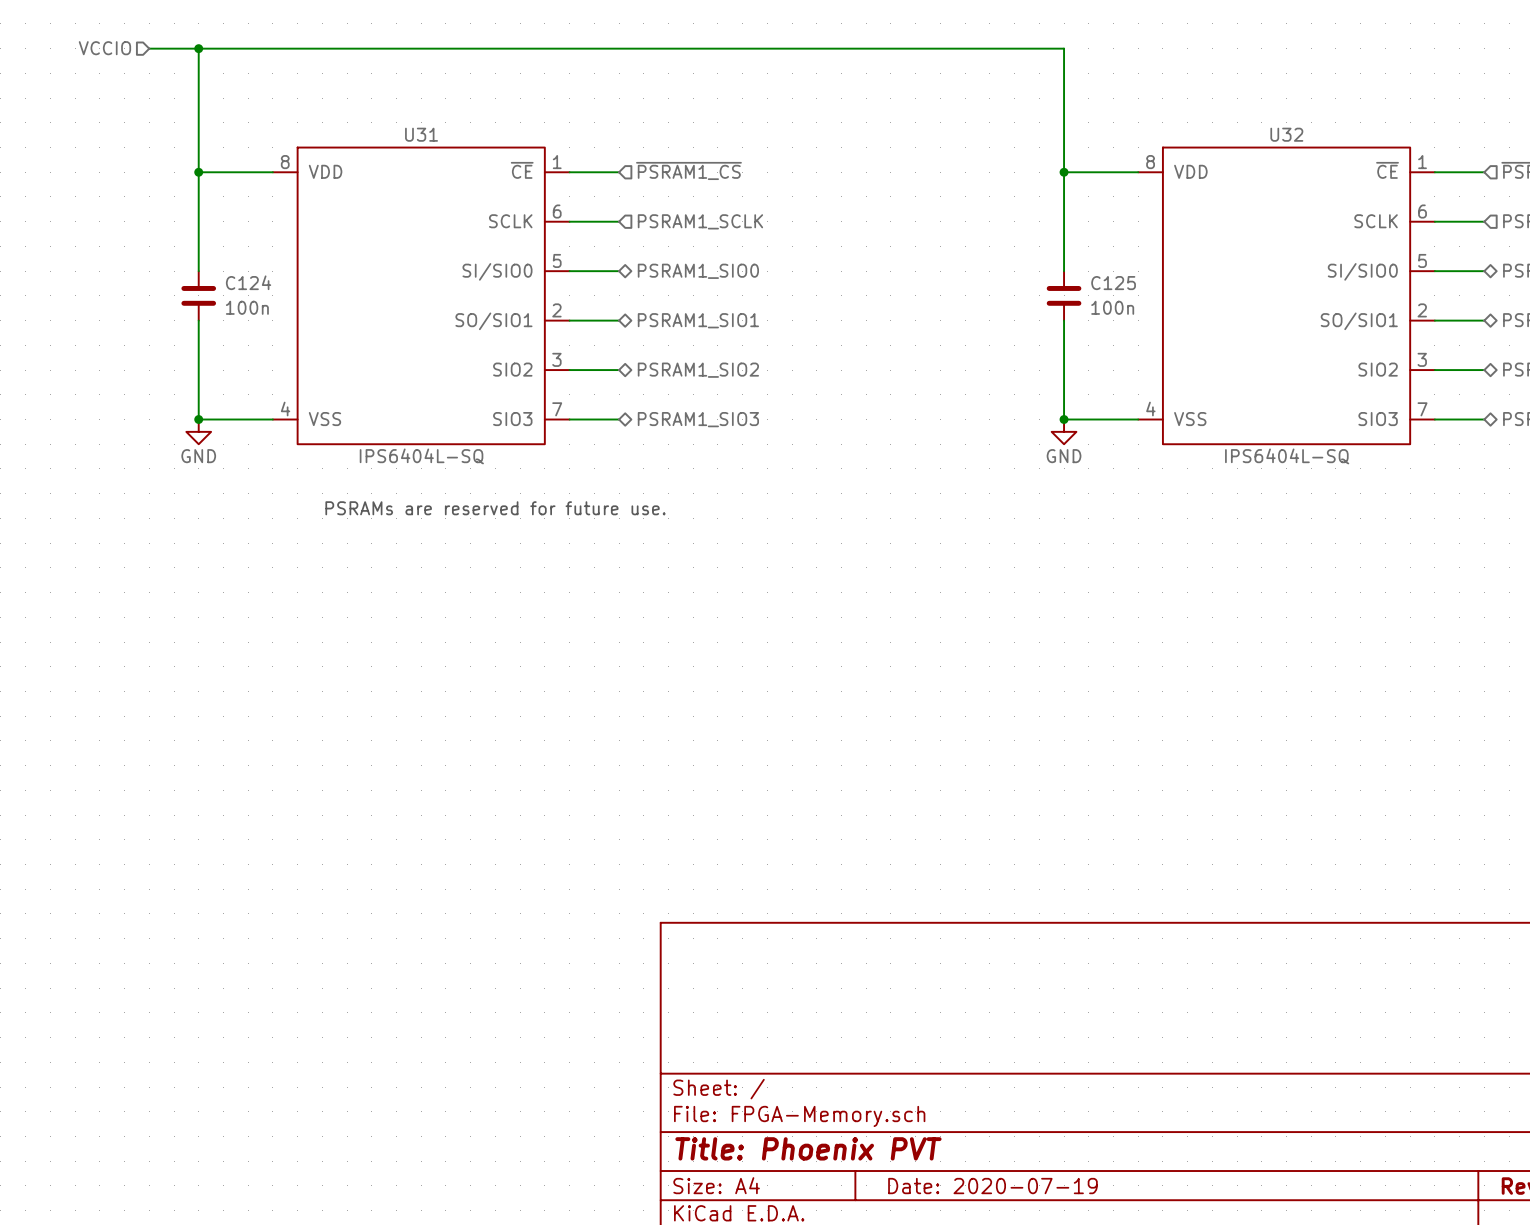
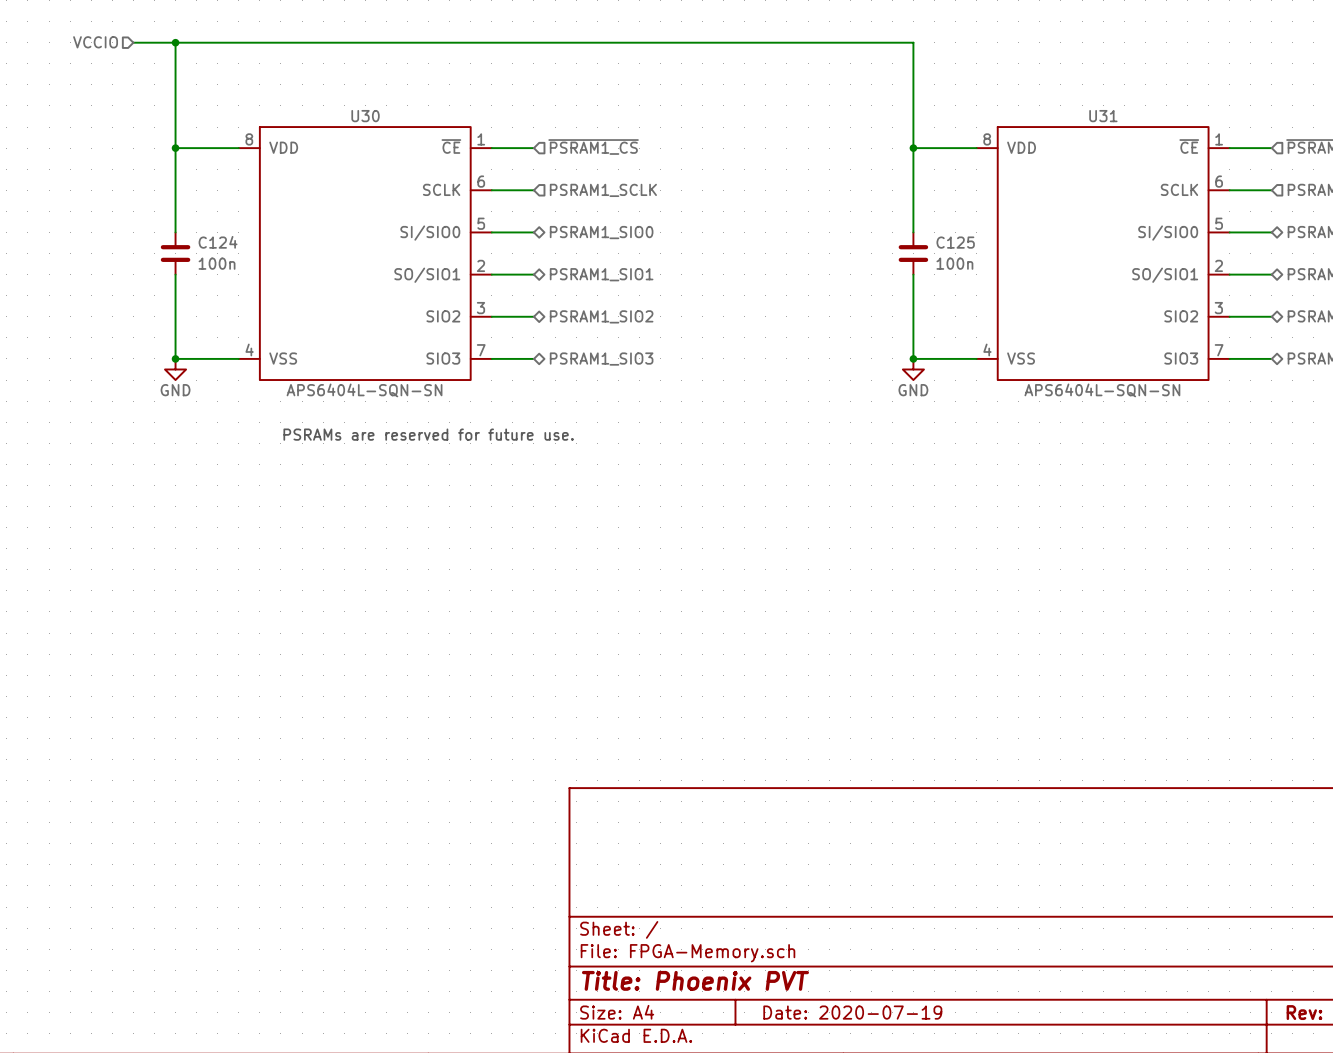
U31 name: U31 (421, 134) -> U30 (365, 116)
U32 name: U32 (1286, 134) -> U31 (1103, 116)
U31 value: IPS6404L-SQ (421, 456) -> APS6404L-SQN-SN (364, 390)
U32 value: IPS6404L-SQ (1287, 456) -> APS6404L-SQN-SN (1102, 390)

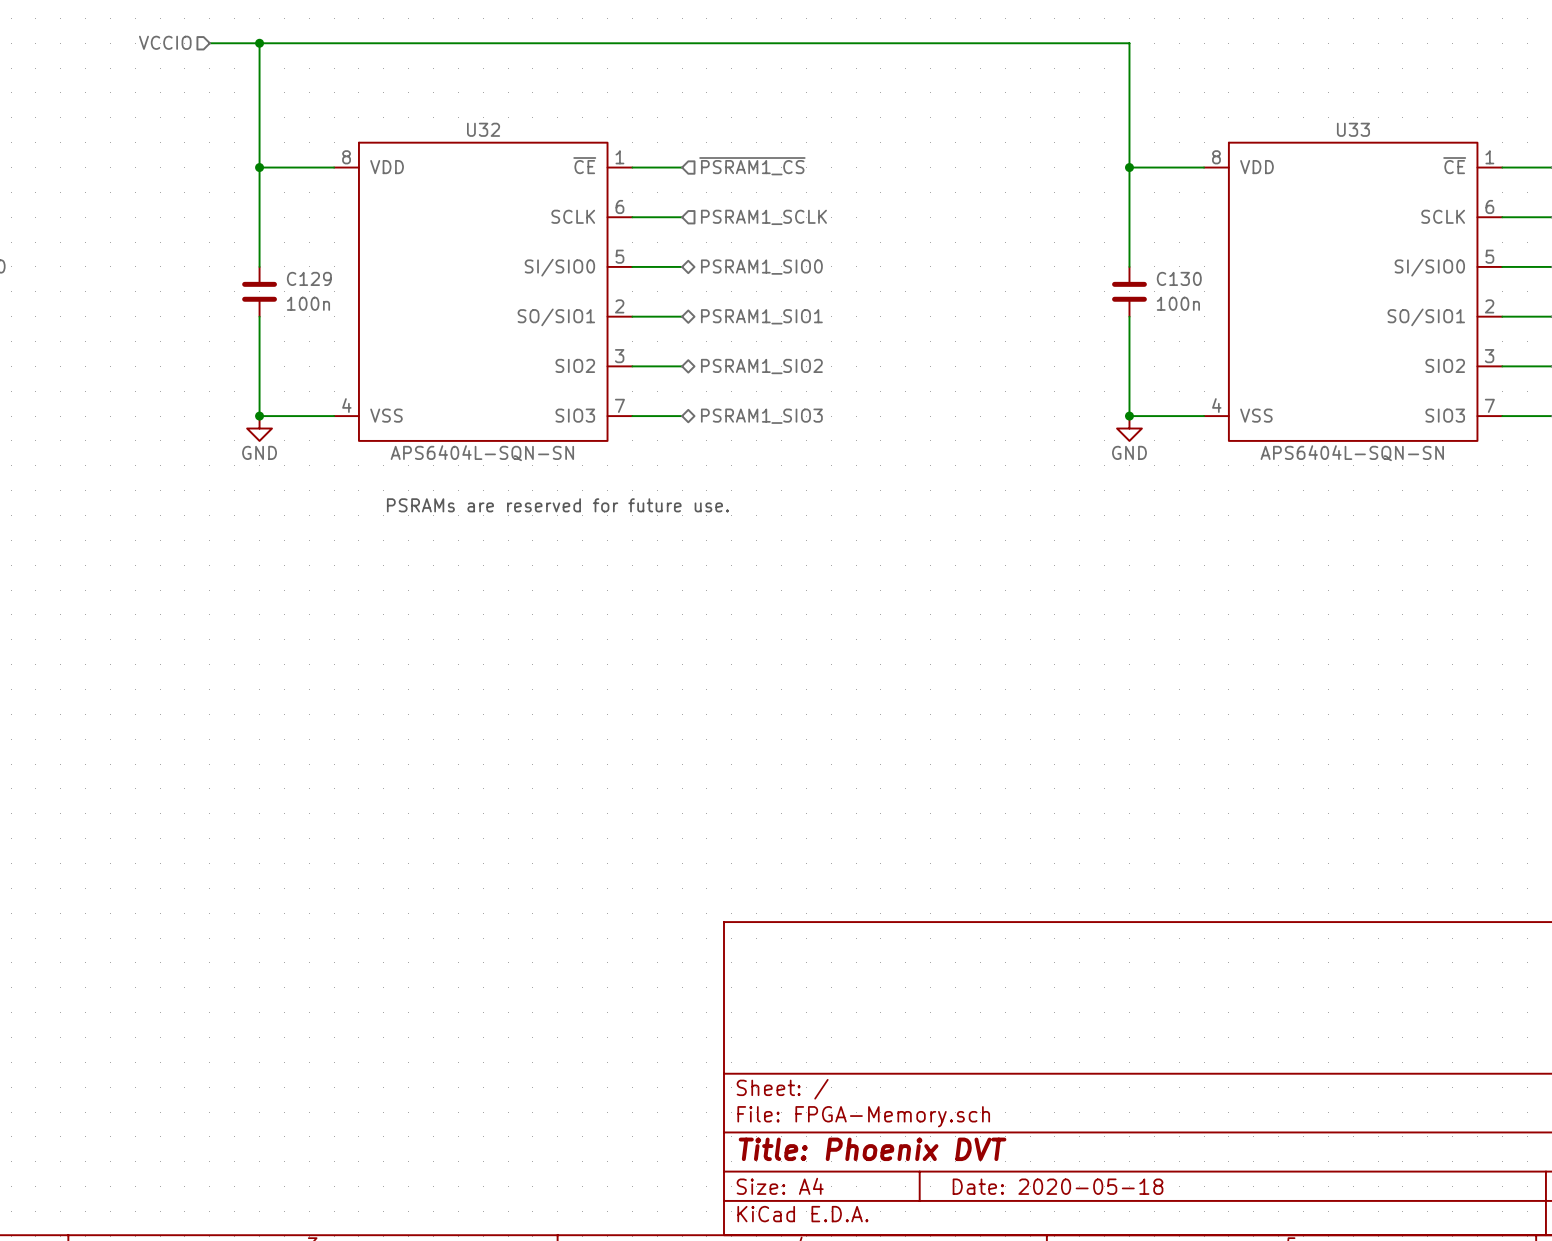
U30 name: U30 (365, 116) -> U32 (483, 129)
U31 name: U31 (1103, 116) -> U33 (1353, 129)
C124 name: C124 (218, 242) -> C129 (309, 278)
C125 name: C125 (955, 242) -> C130 (1179, 278)
title block: Title: Phoenix PVT (695, 980) -> Title: Phoenix DVT (872, 1149)
title block: Date: 2020-07-19 (852, 1012) -> Date: 2020-05-18 (1058, 1186)

